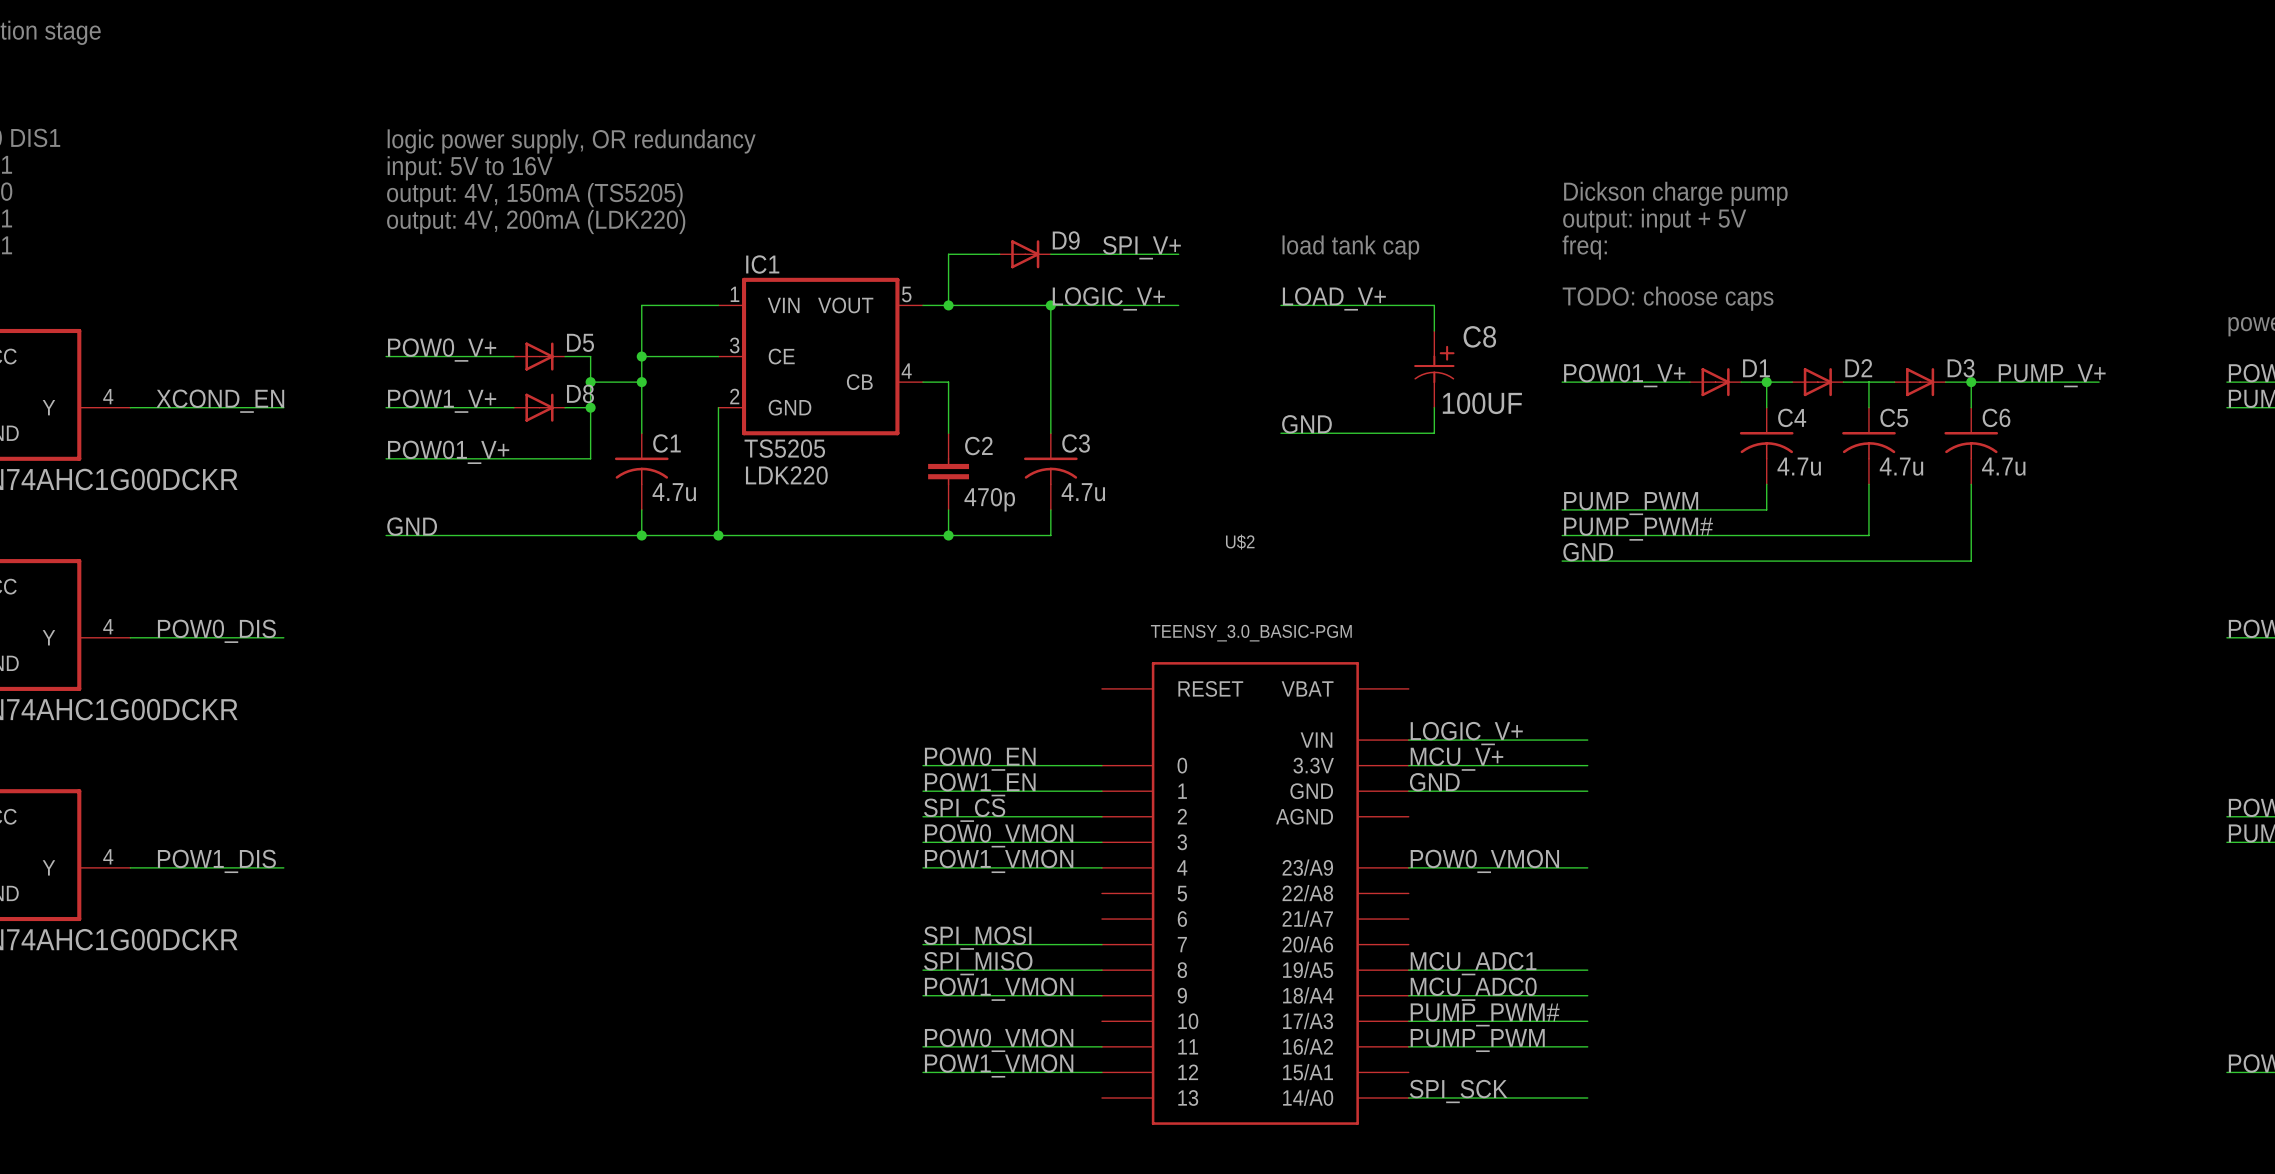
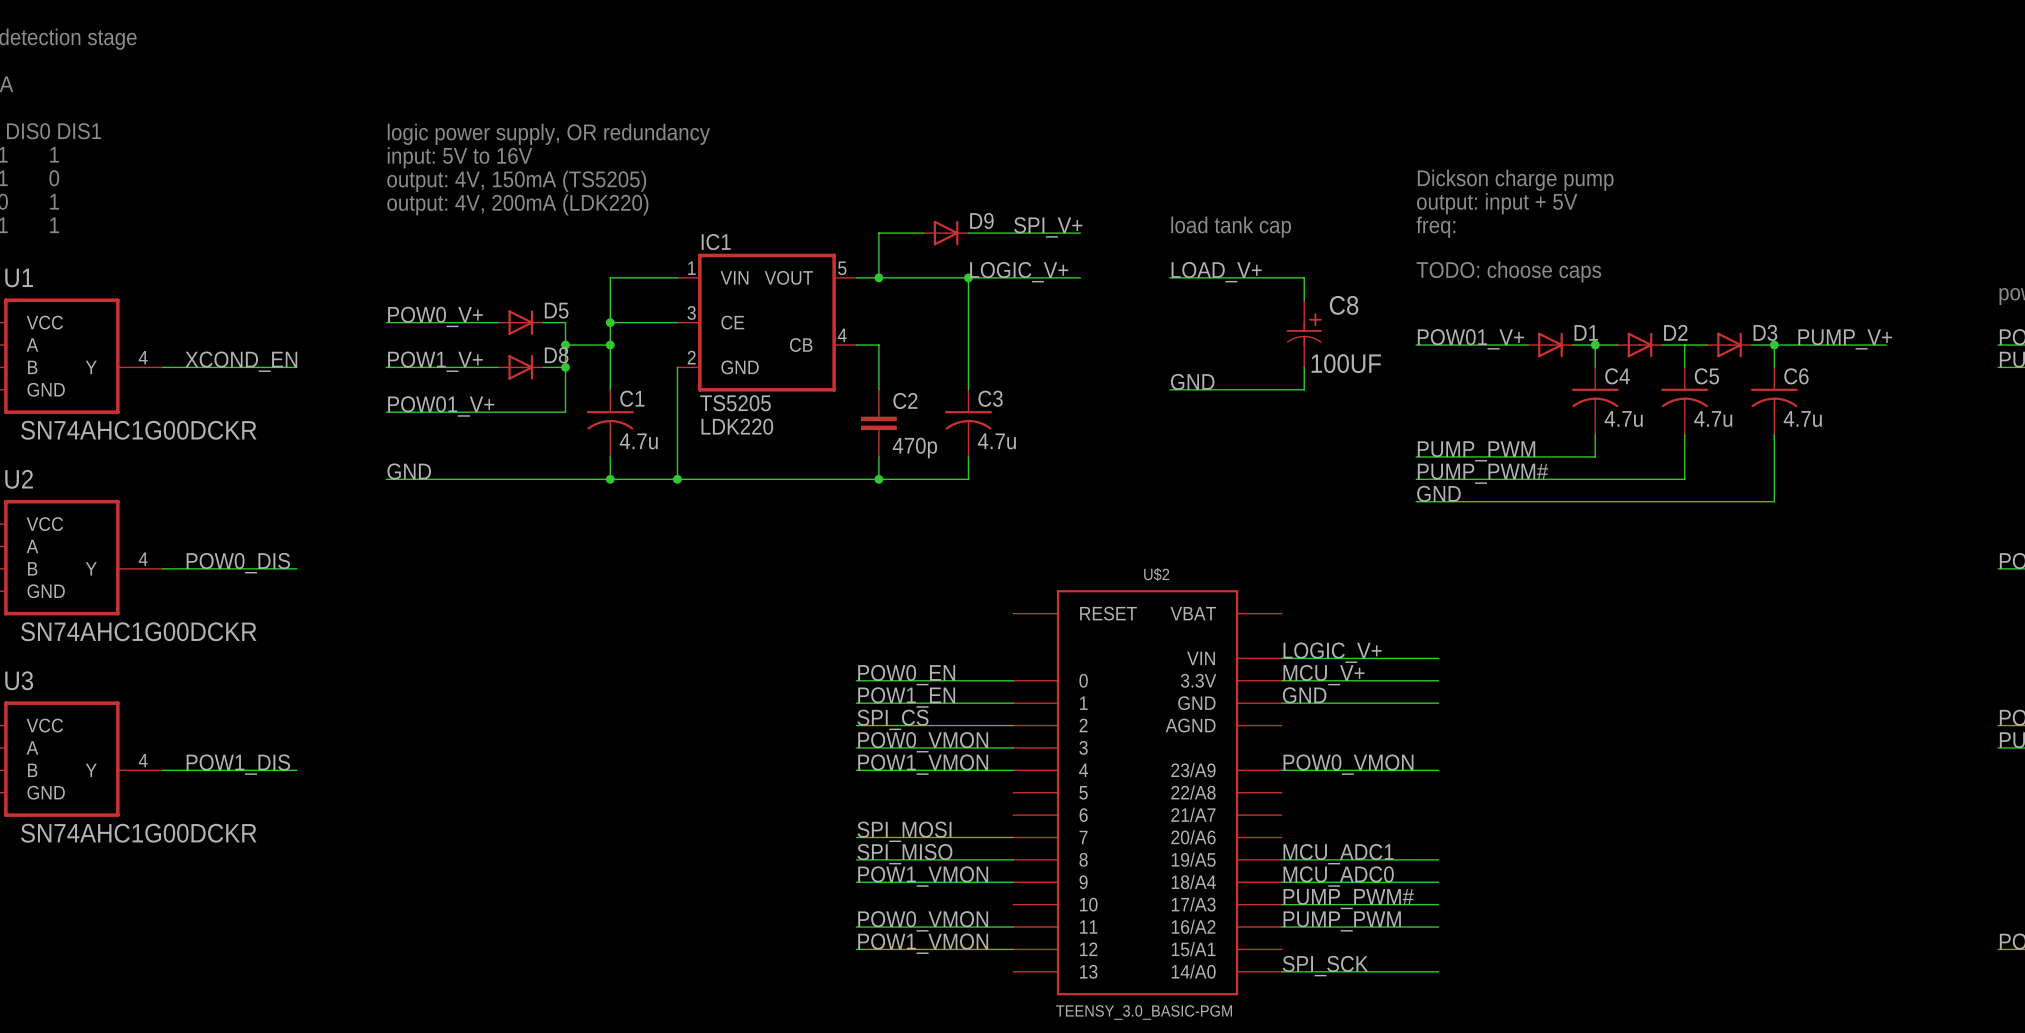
U$2 name position: U$2 (1240, 542) -> U$2 (1156, 574)
U$2 value position: TEENSY_3.0_BASIC-PGM (1251, 633) -> TEENSY_3.0_BASIC-PGM (1144, 1012)

